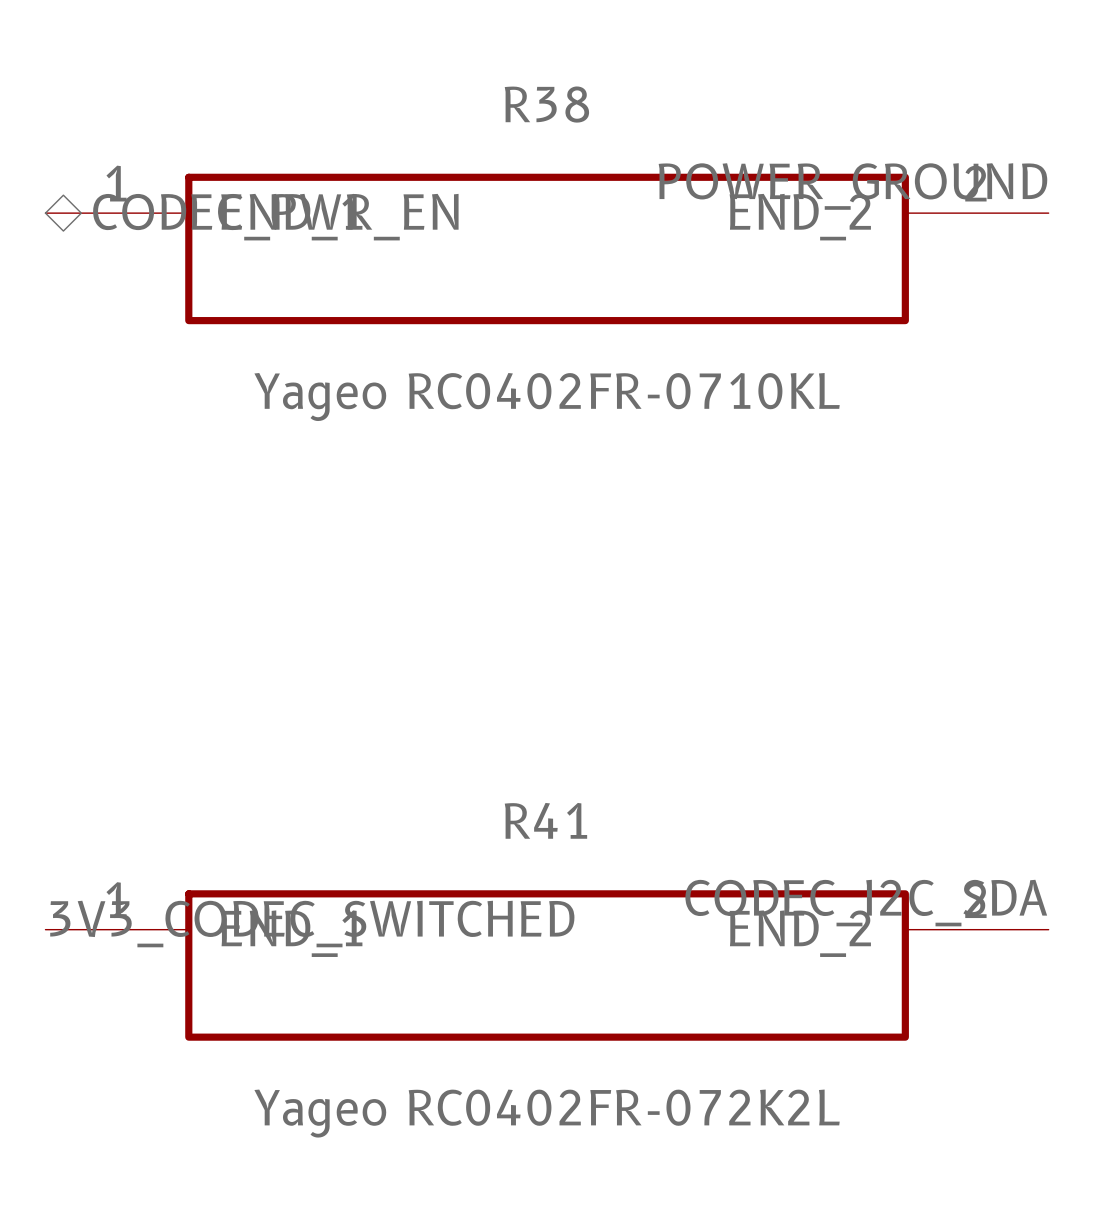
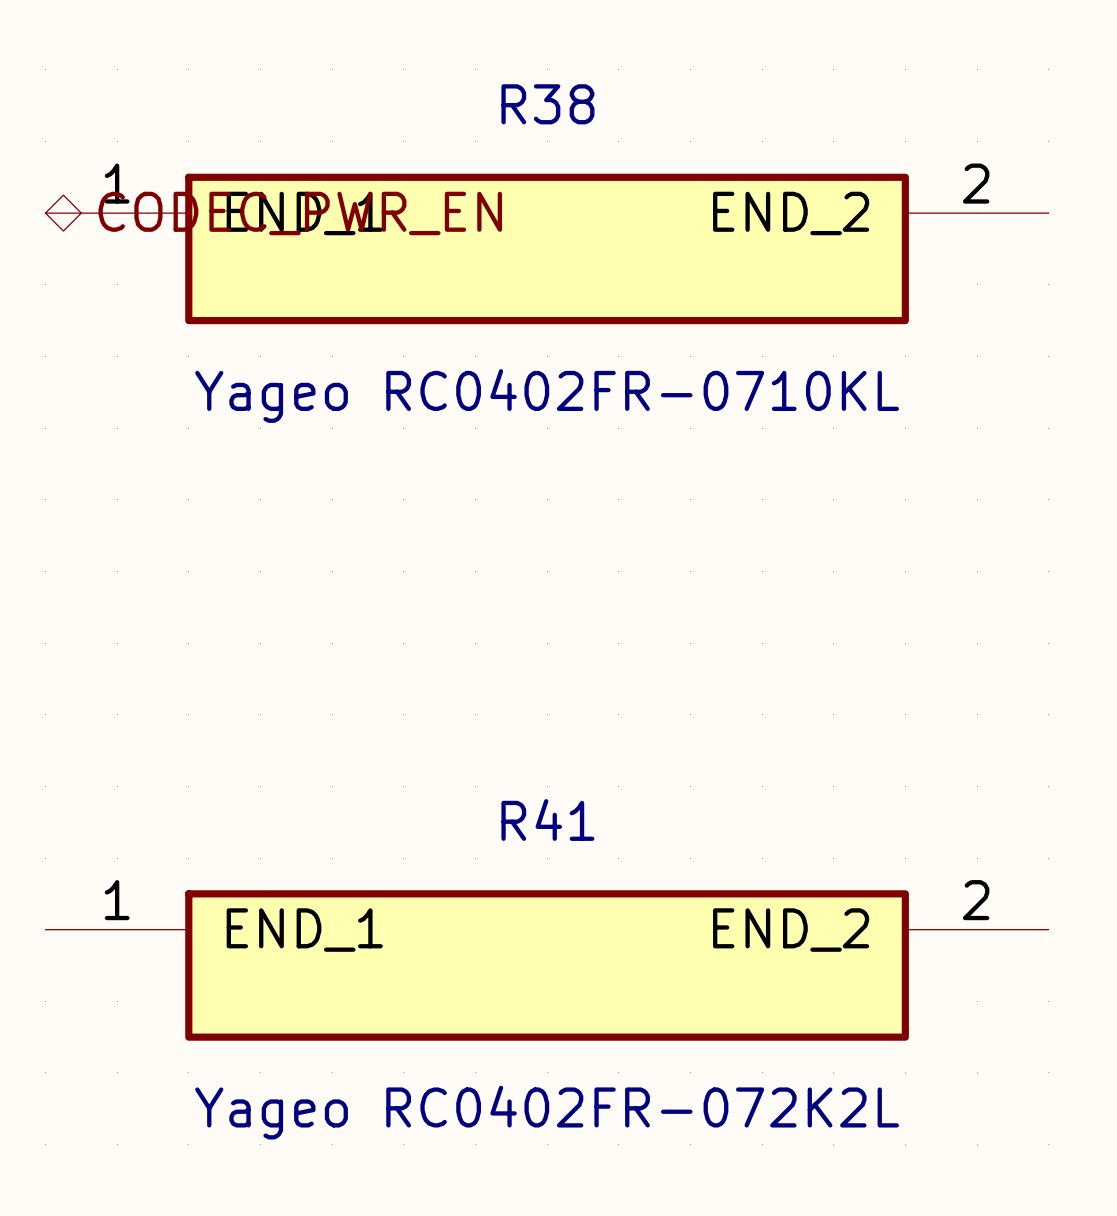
label: POWER_GROUND (852, 186) -> none
label: CODEC_I2C_SDA (866, 903) -> none
label: 3V3_CODEC_SWITCHED (312, 924) -> none

